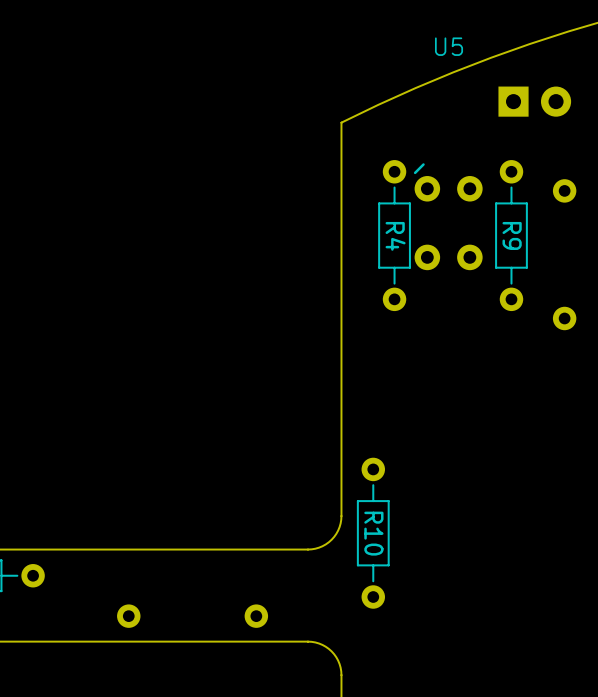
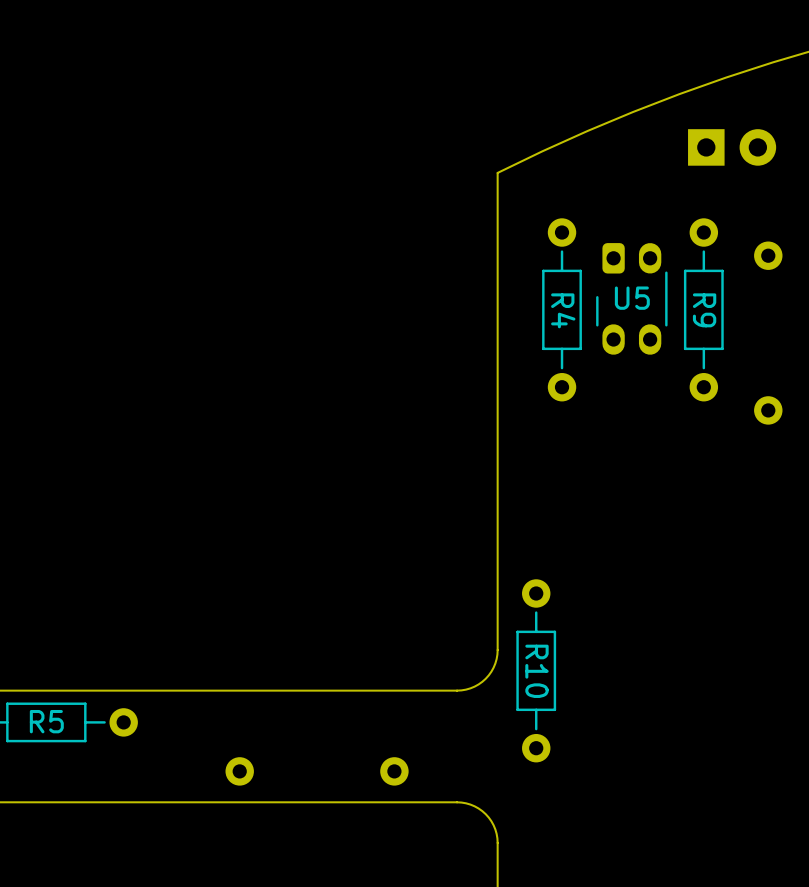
U5 name position: U5 (449, 46) -> U5 (632, 298)
line: (423, 164) (415, 172) -> none
U5 footprint: [414, 176, 483, 271] -> [596, 243, 668, 355]

